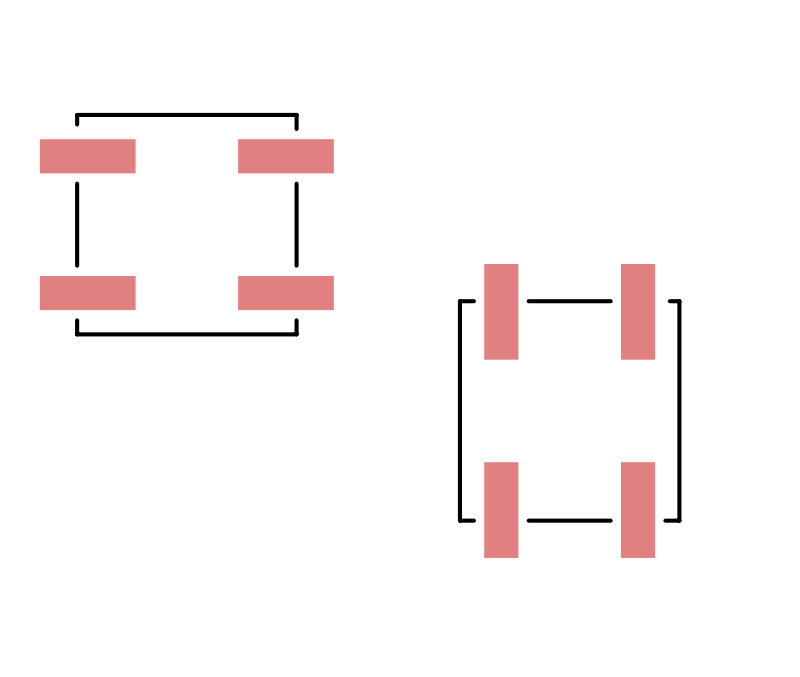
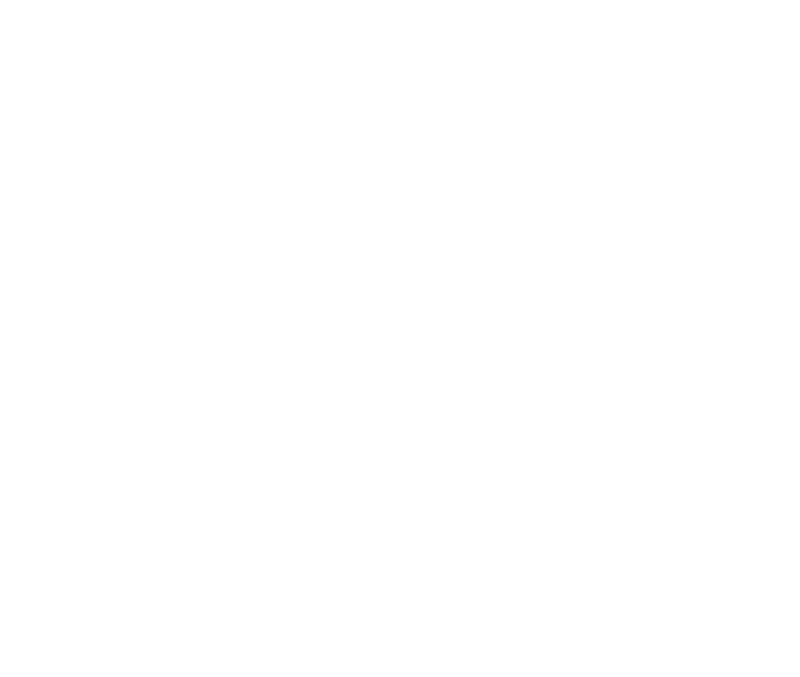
part: (186, 224) -> none
part: (569, 410) -> none

